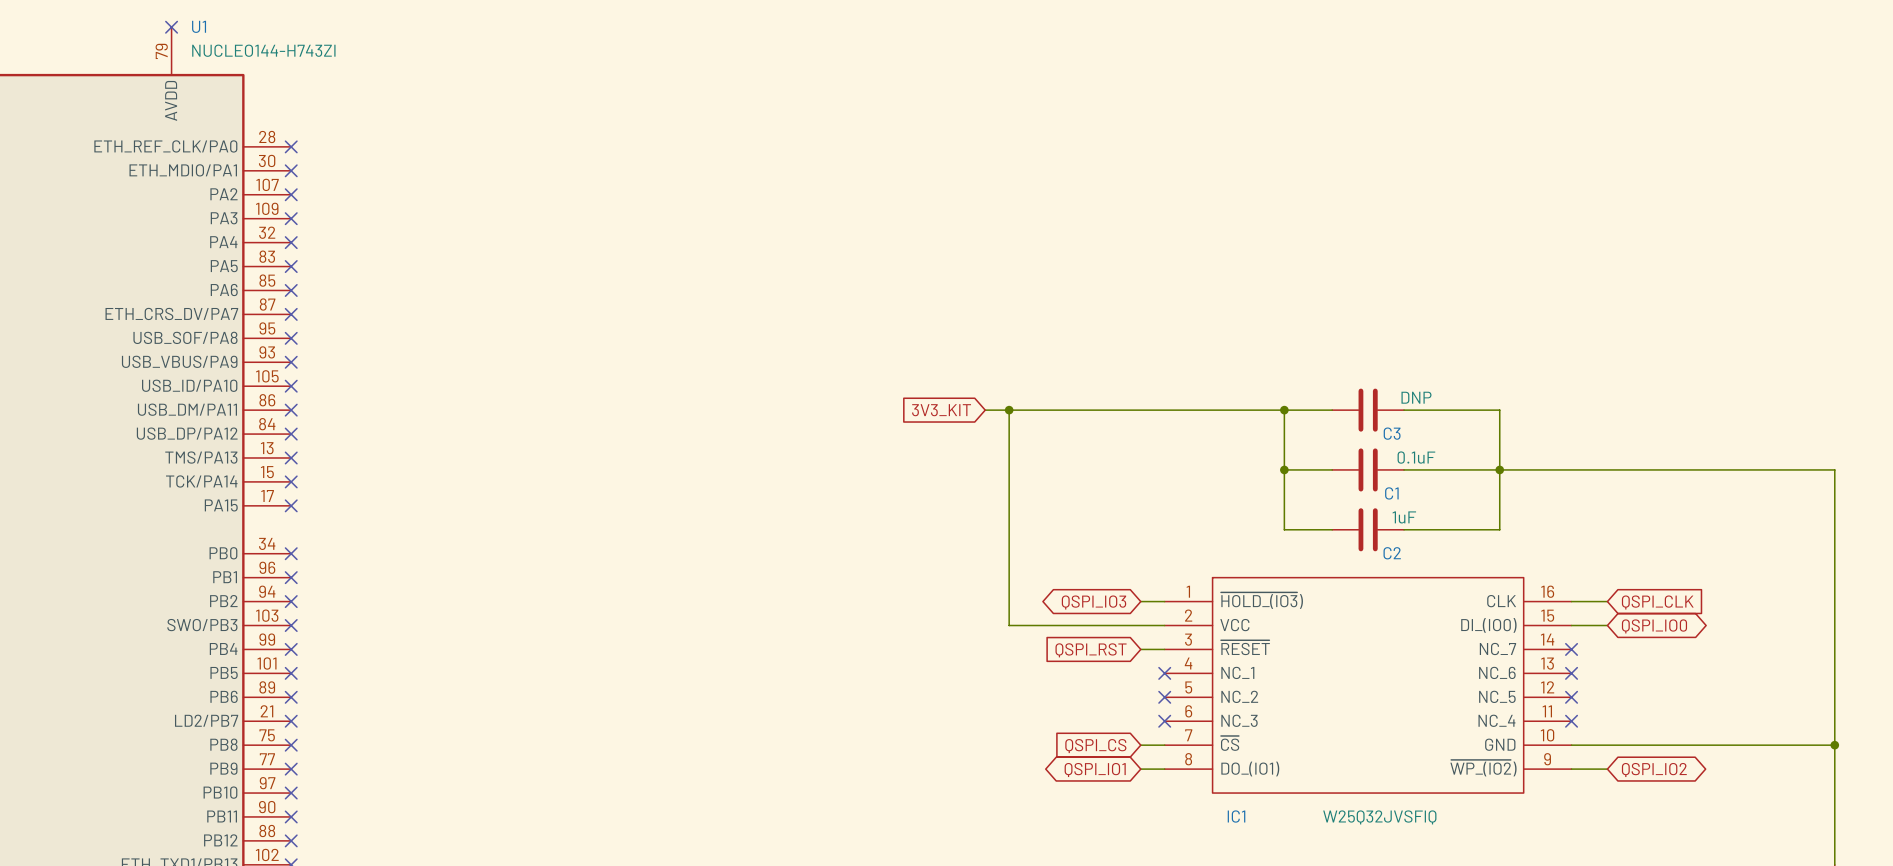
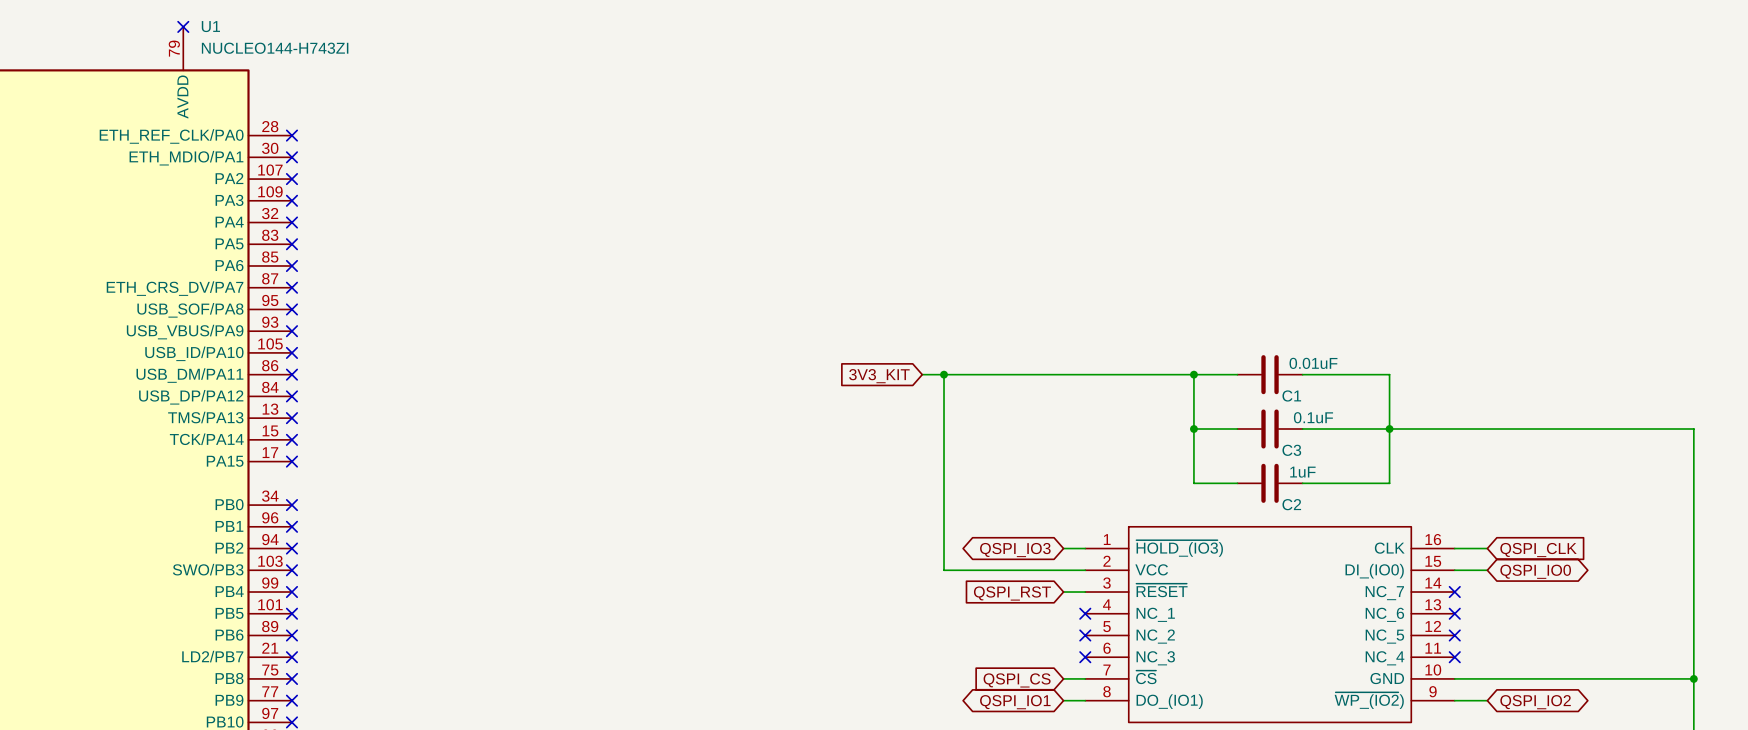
C3 value: DNP (1416, 397) -> 0.01uF (1313, 363)
C3 name: C3 (1392, 433) -> C1 (1291, 395)
C1 name: C1 (1391, 493) -> C3 (1291, 450)

